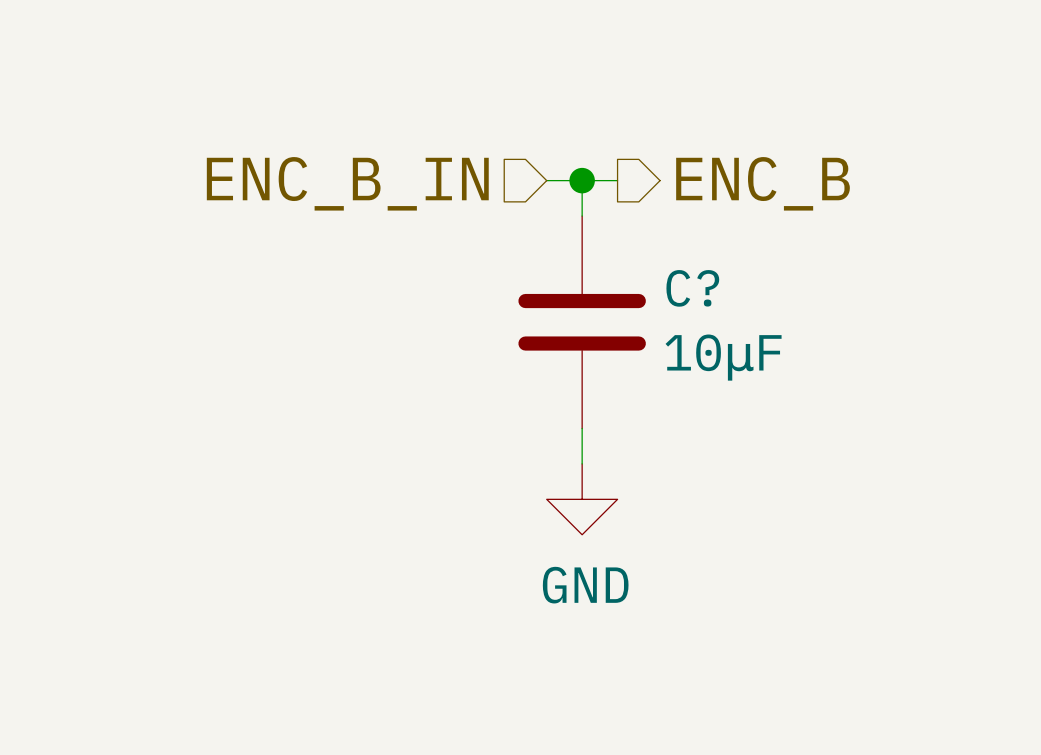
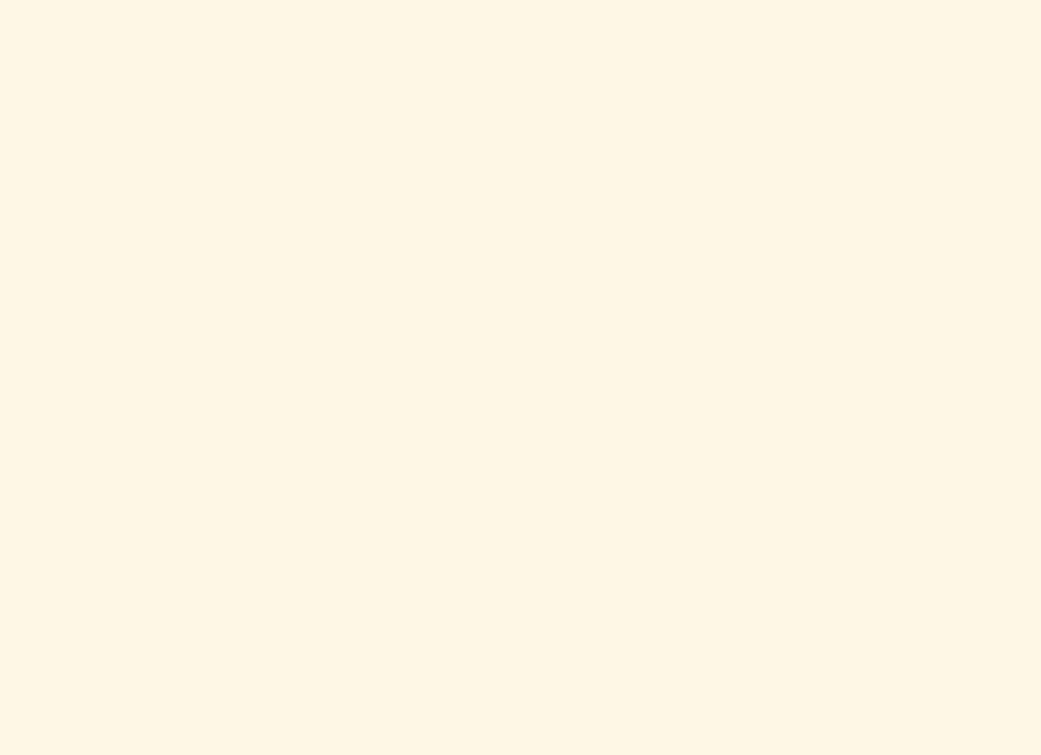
wire: (546, 180) (617, 180) -> none
wire: (582, 180) (582, 216) -> none
junction: (582, 180) -> none
hierarchical label: ENC_B_IN (347, 183) -> none
hierarchical label: ENC_B (763, 183) -> none
C?: 10μF (582, 322) -> none
wire: (582, 428) (582, 463) -> none
power symbol: GND (582, 499) -> none

